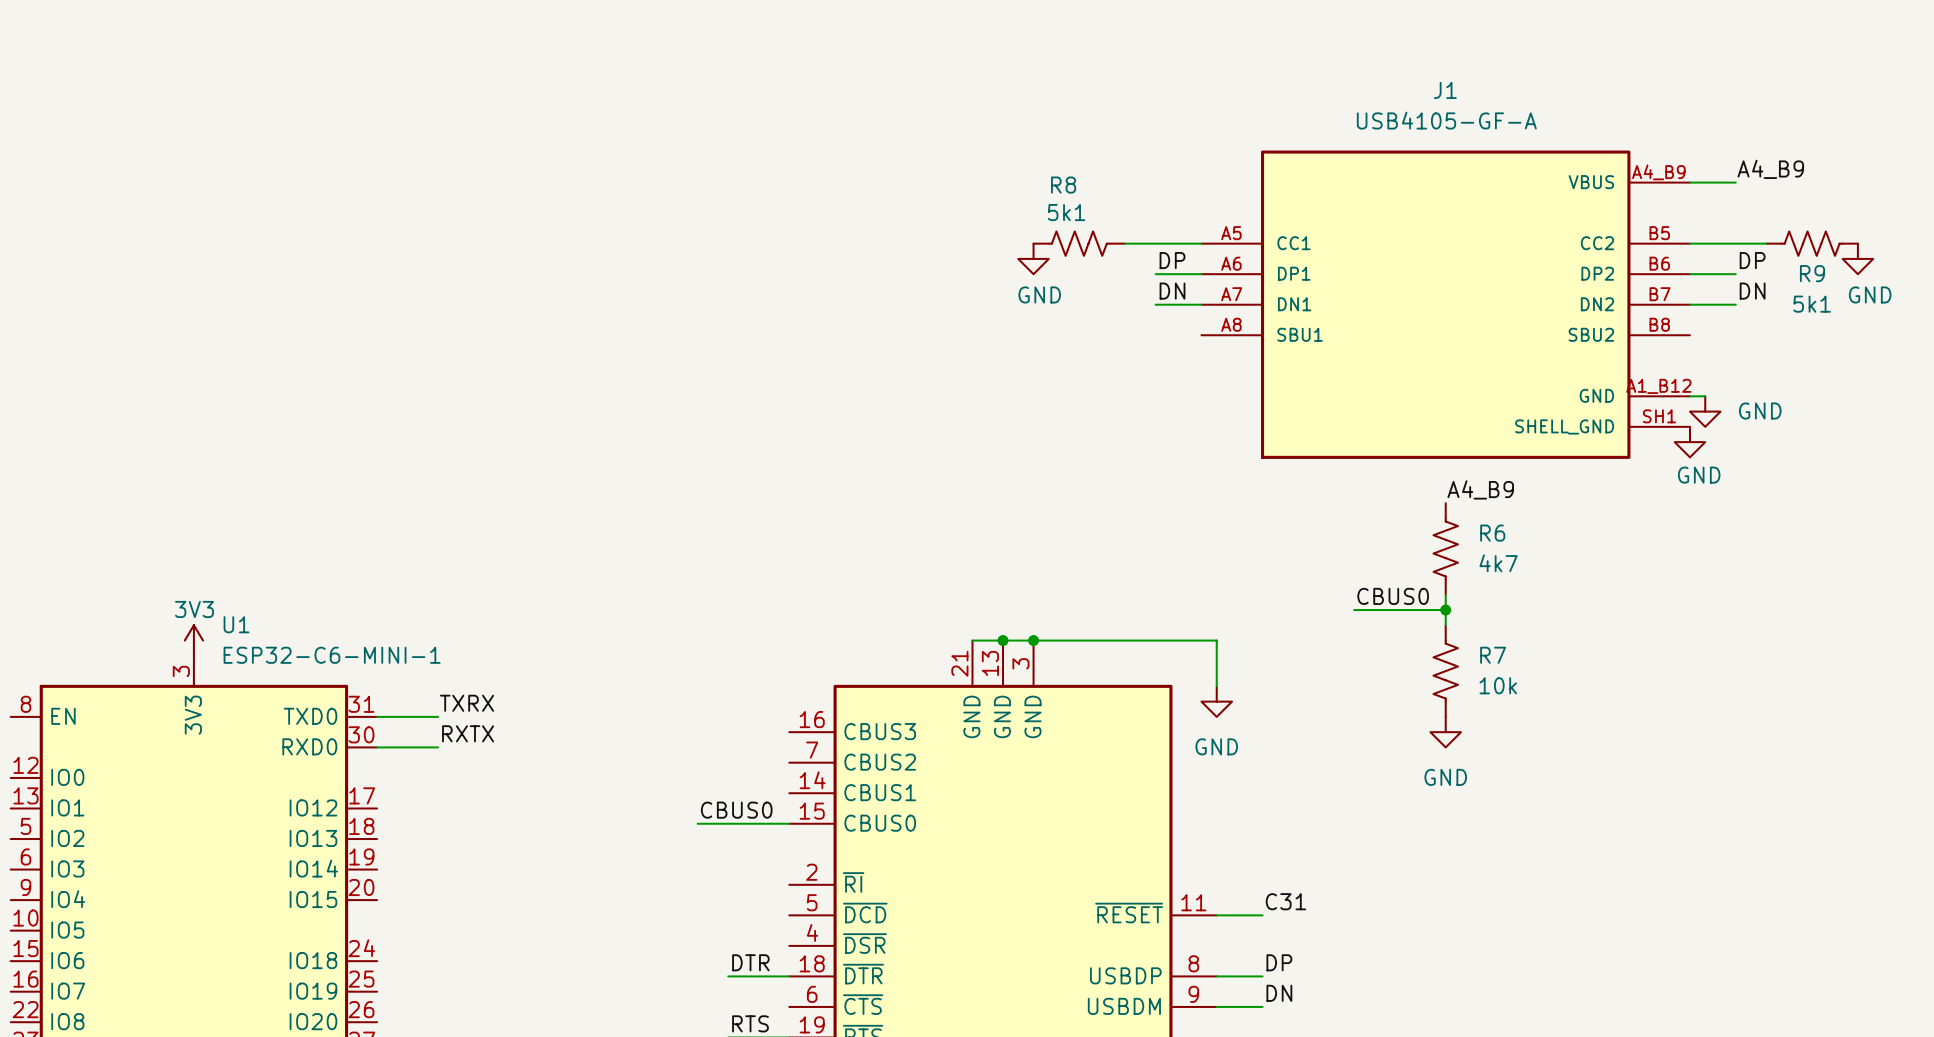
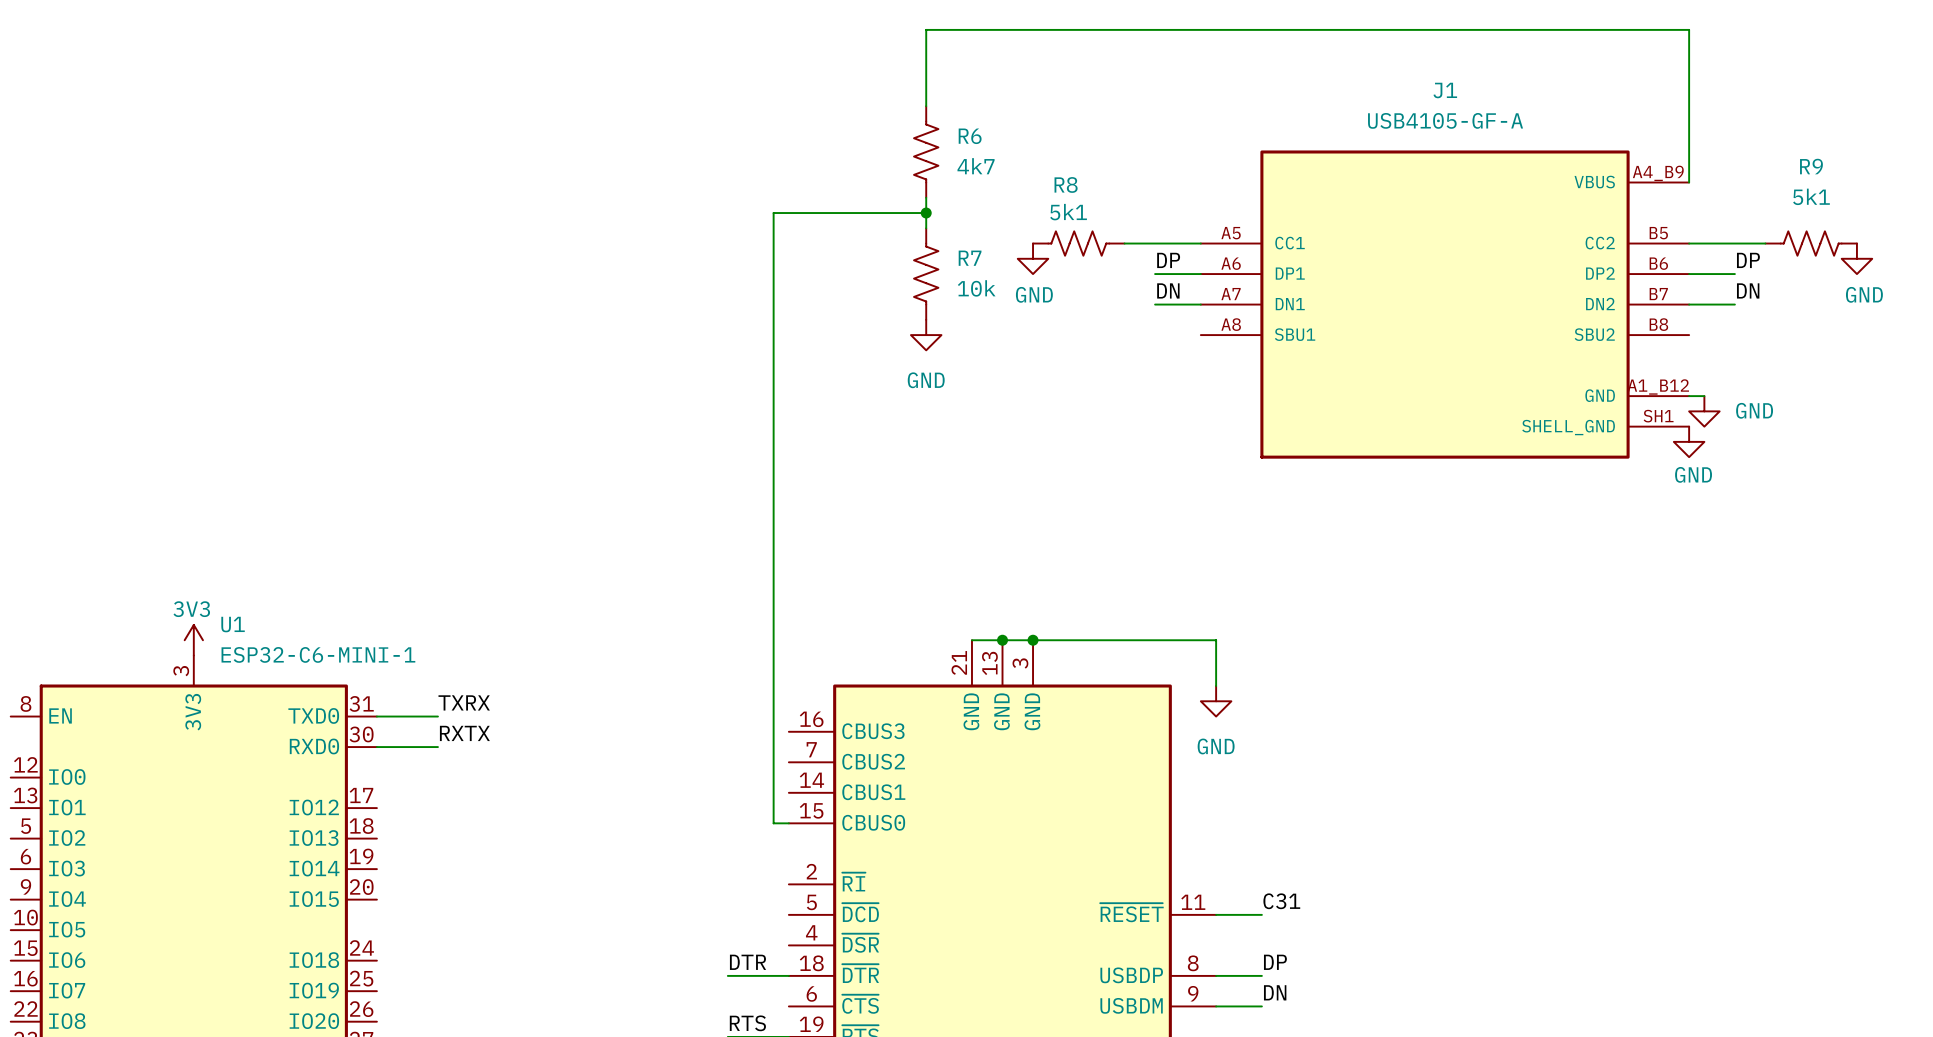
label: A4_B9 (1770, 169) -> none
wire: (1689, 182) (1735, 182) -> (1689, 182) (1689, 29) (926, 29) (926, 106)
wire: none -> (926, 197) (926, 228)
junction: none -> (926, 213)
R9 name position: R9 (1812, 273) -> R9 (1811, 166)
R9 value position: 5k1 (1812, 304) -> 5k1 (1811, 196)
power symbol: none -> GND (926, 335)
label: A4_B9 (1480, 489) -> none
R6 position: (1445, 548) -> (926, 151)
wire: (1445, 594) (1445, 625) -> none
label: CBUS0 (1393, 596) -> none
wire: (1354, 610) (1445, 610) -> none
junction: (1445, 610) -> none
R7 position: (1445, 671) -> (926, 274)
power symbol: GND (1445, 732) -> none
label: CBUS0 (736, 810) -> none
wire: (697, 823) (774, 823) -> (926, 213) (773, 213) (773, 823)

